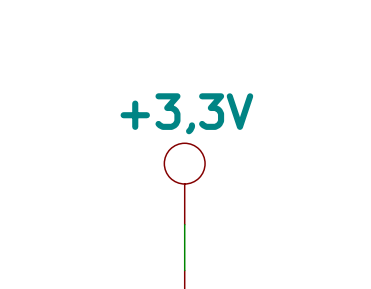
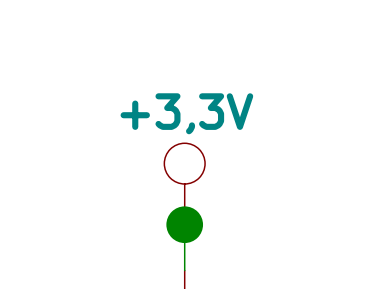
junction: none -> (184, 224)

